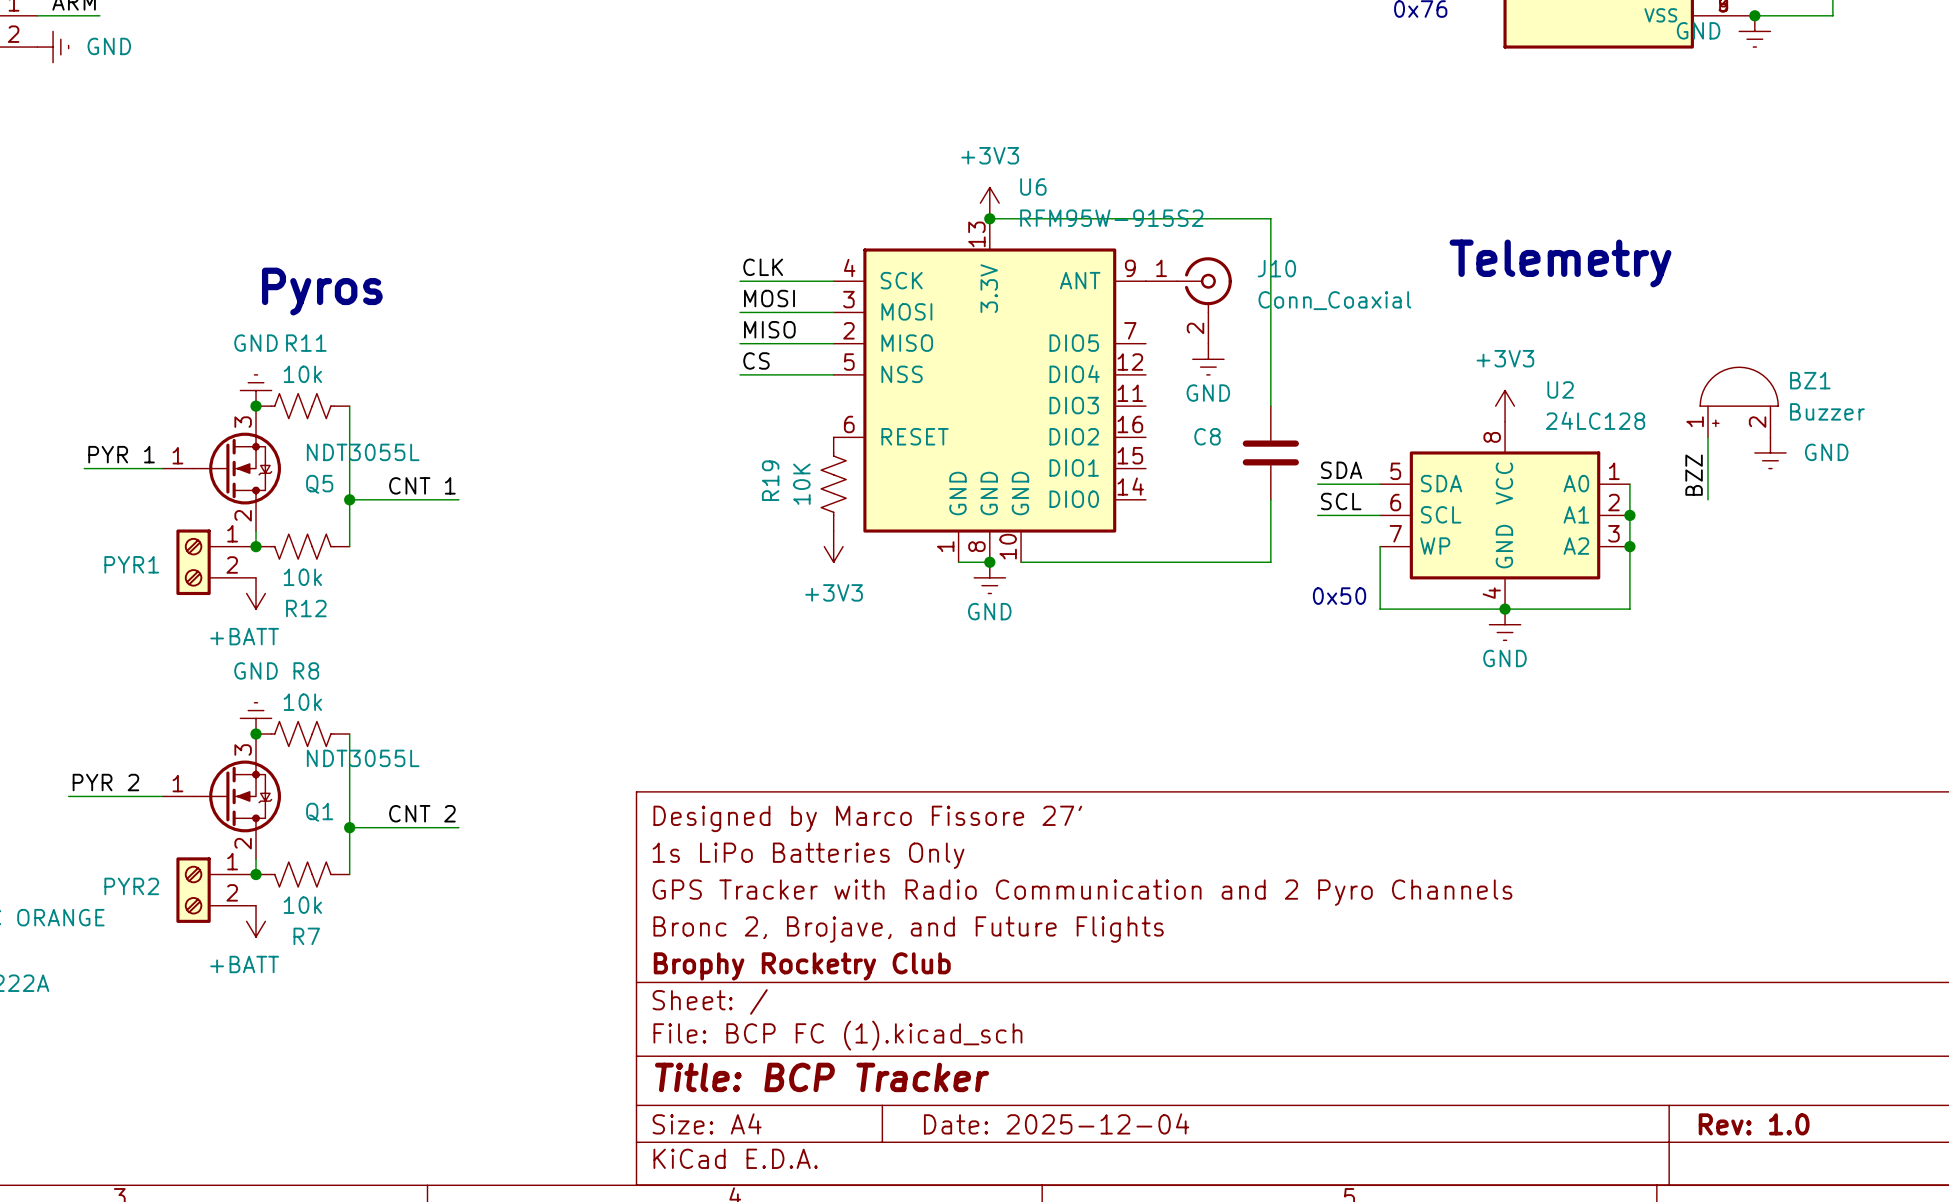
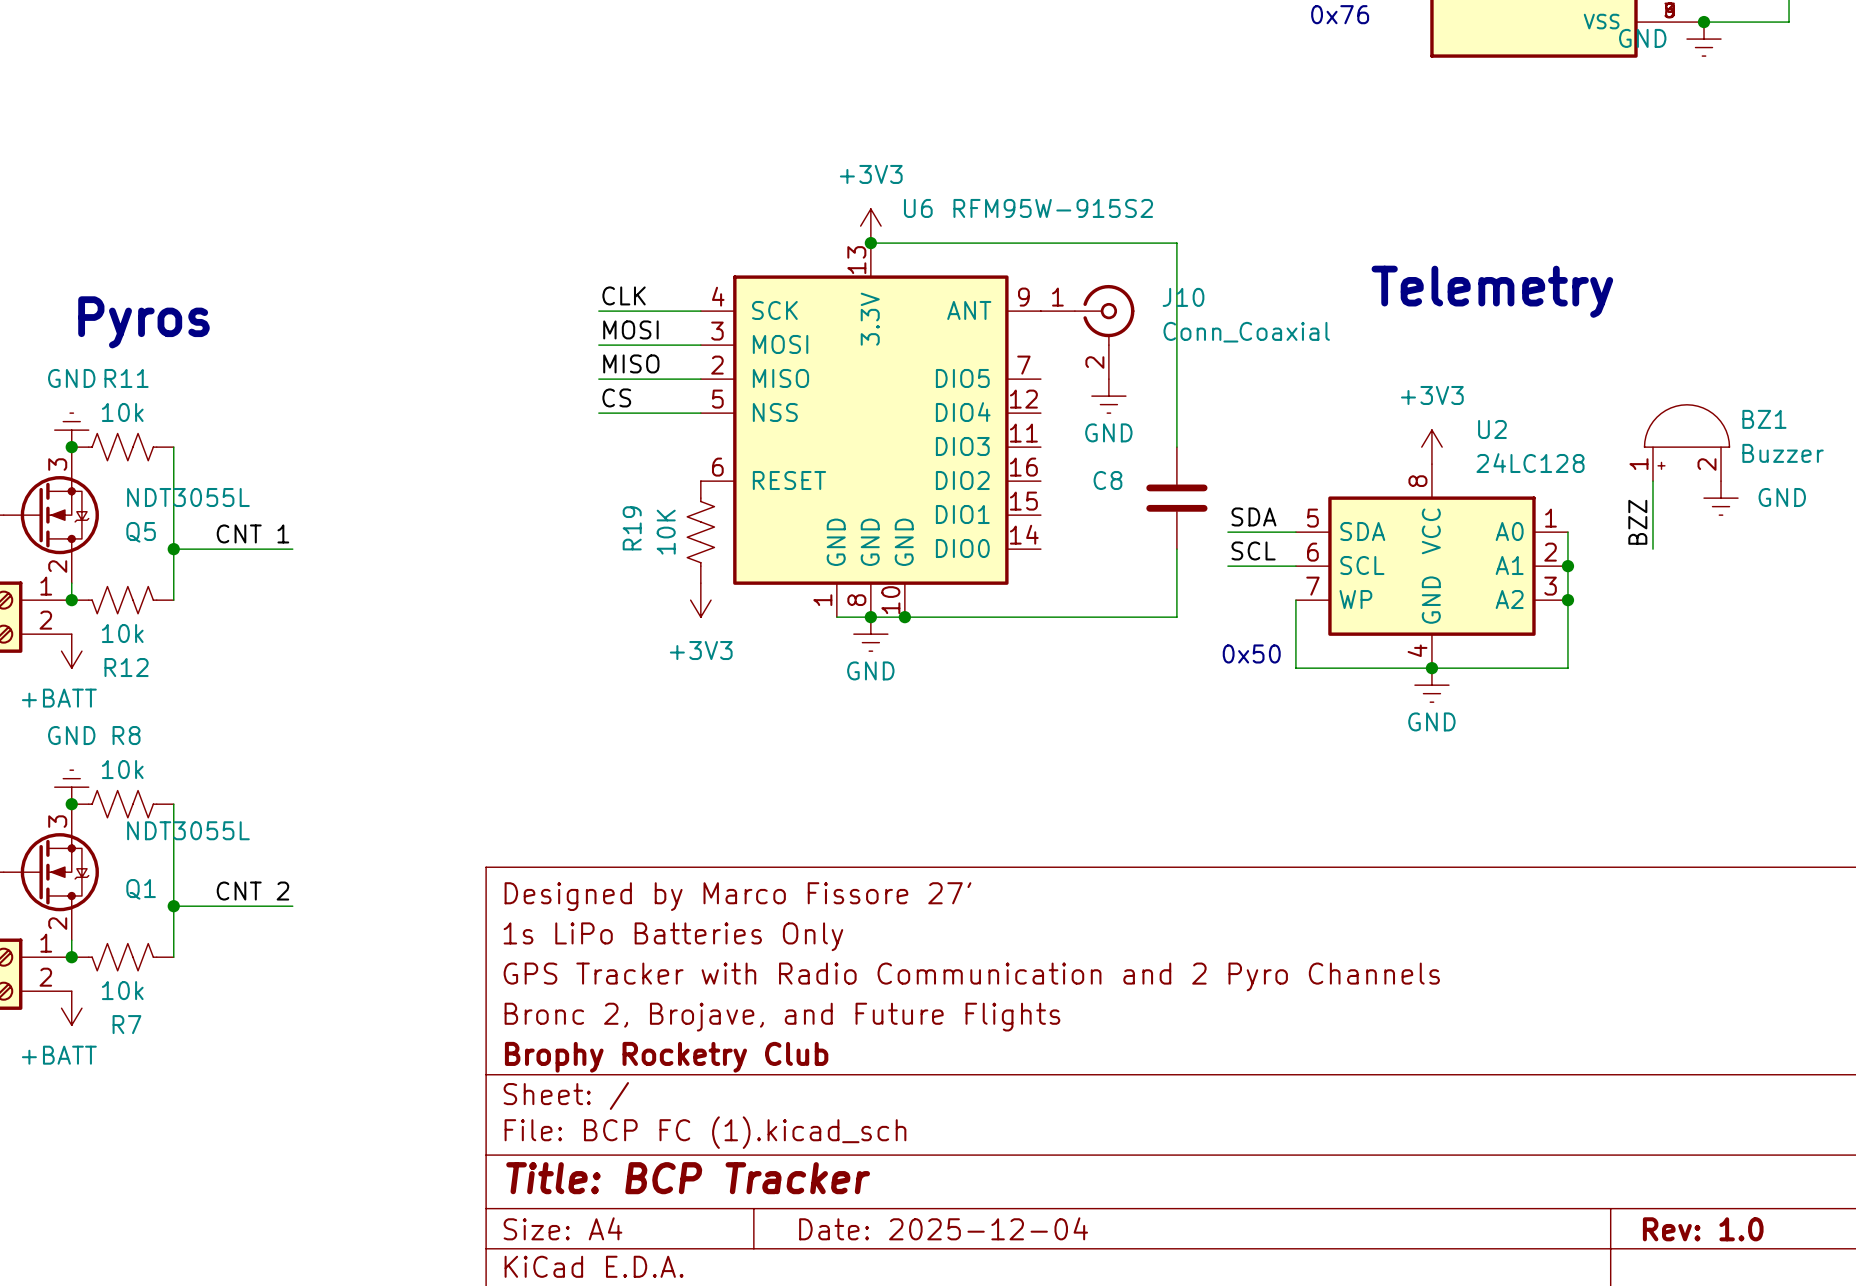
U6 value position: RFM95W-915S2 (1111, 218) -> RFM95W-915S2 (1053, 208)
wire: none -> (870, 617) (904, 617)
junction: none -> (904, 617)

